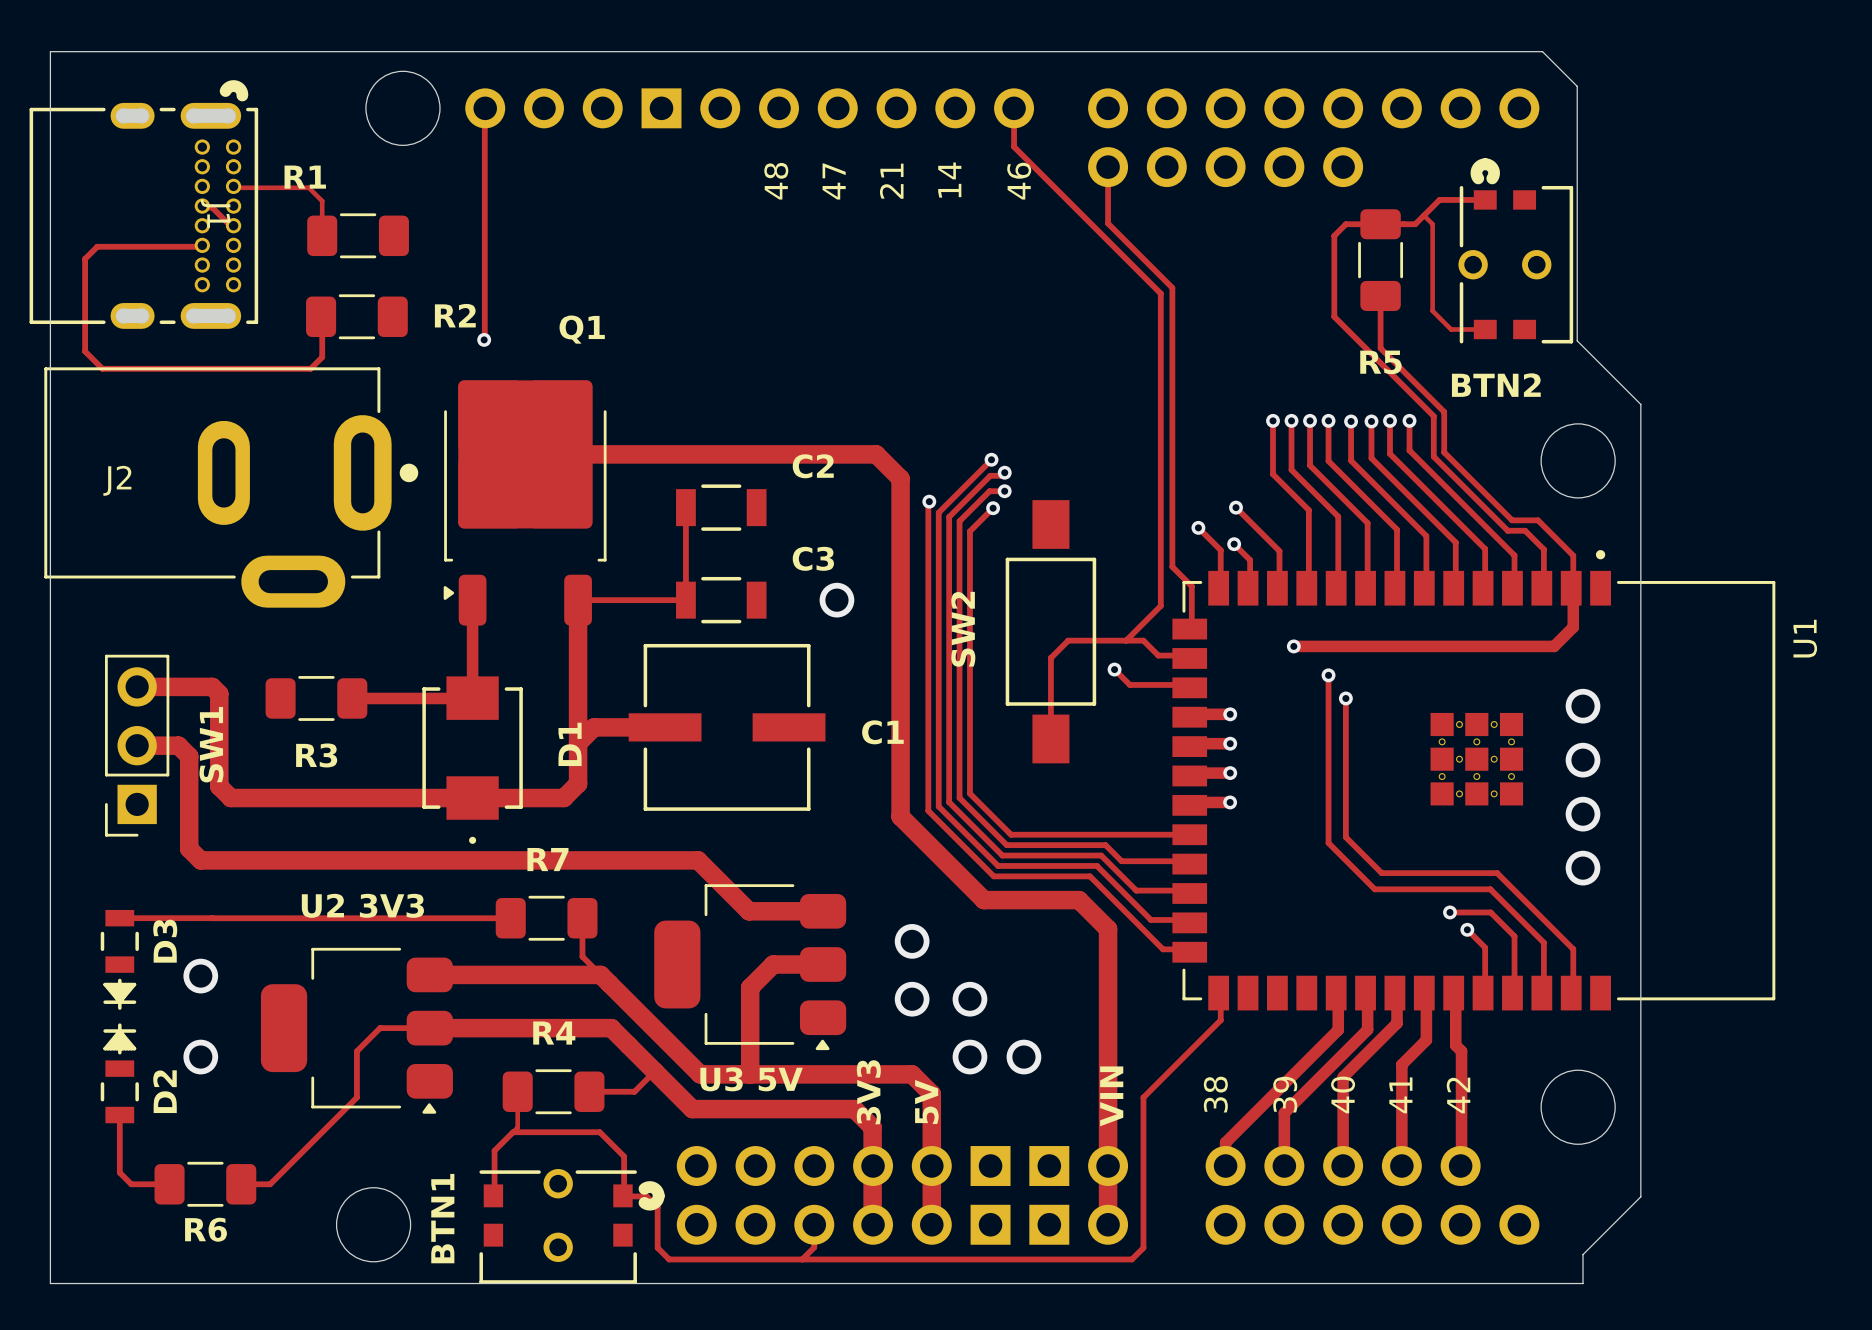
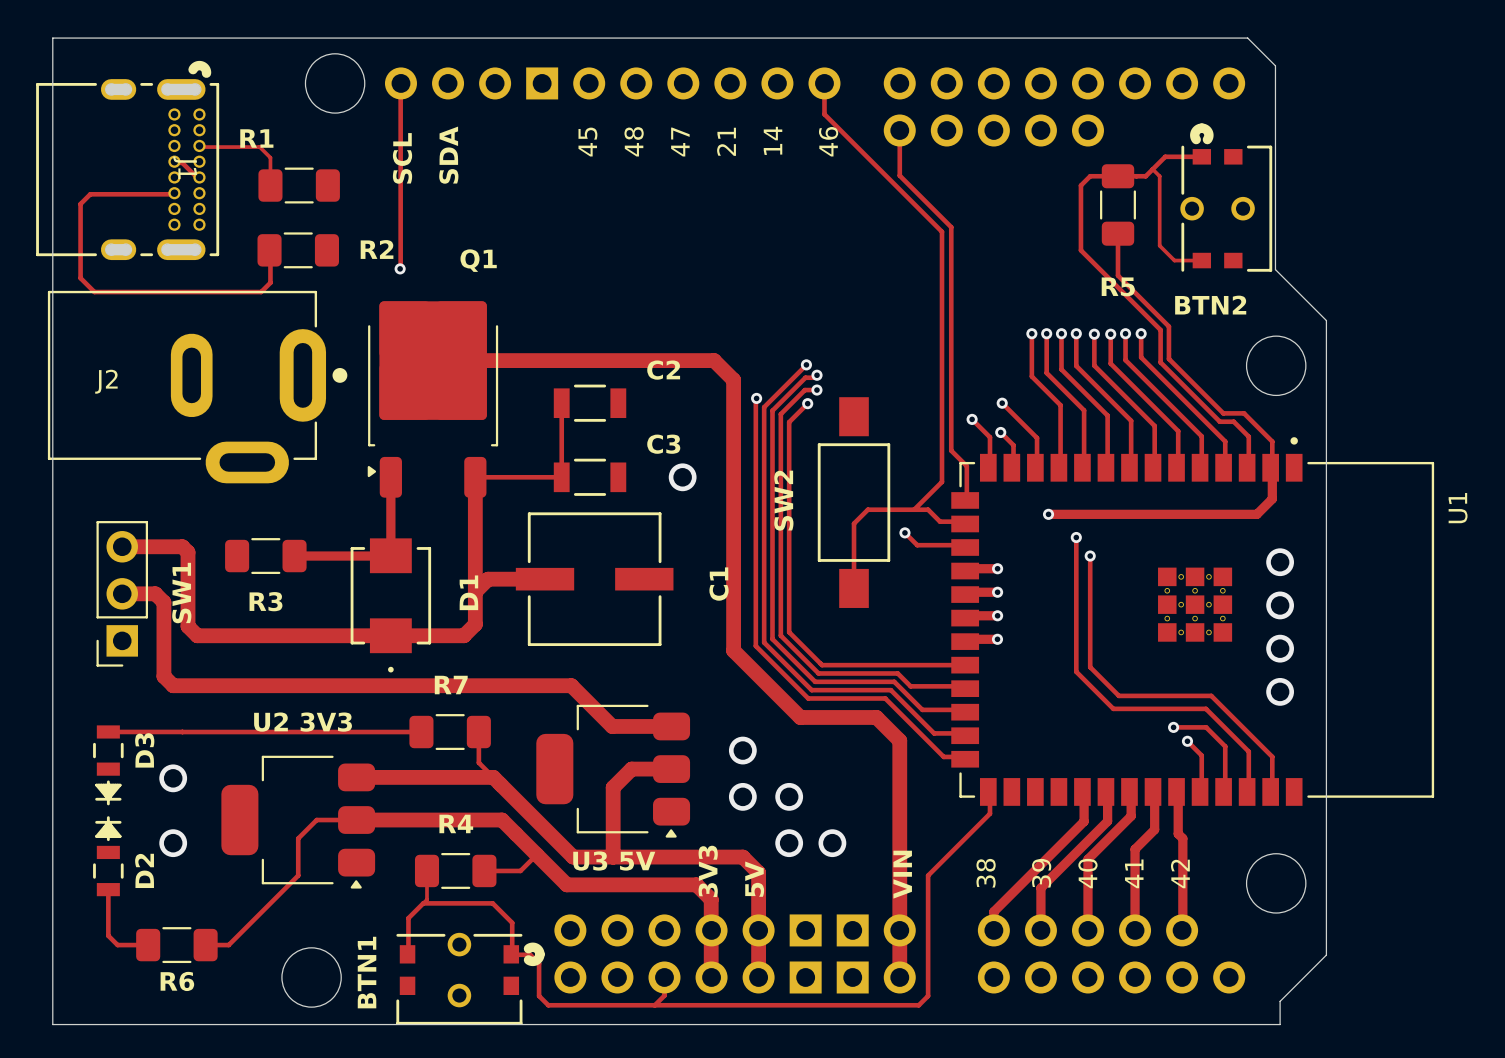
text: none -> 45 (587, 142)
text: none -> SDA (448, 155)
text: none -> SCL (402, 158)
C1 name rotation: 0° (882, 732) -> 90° counterclockwise (719, 584)

